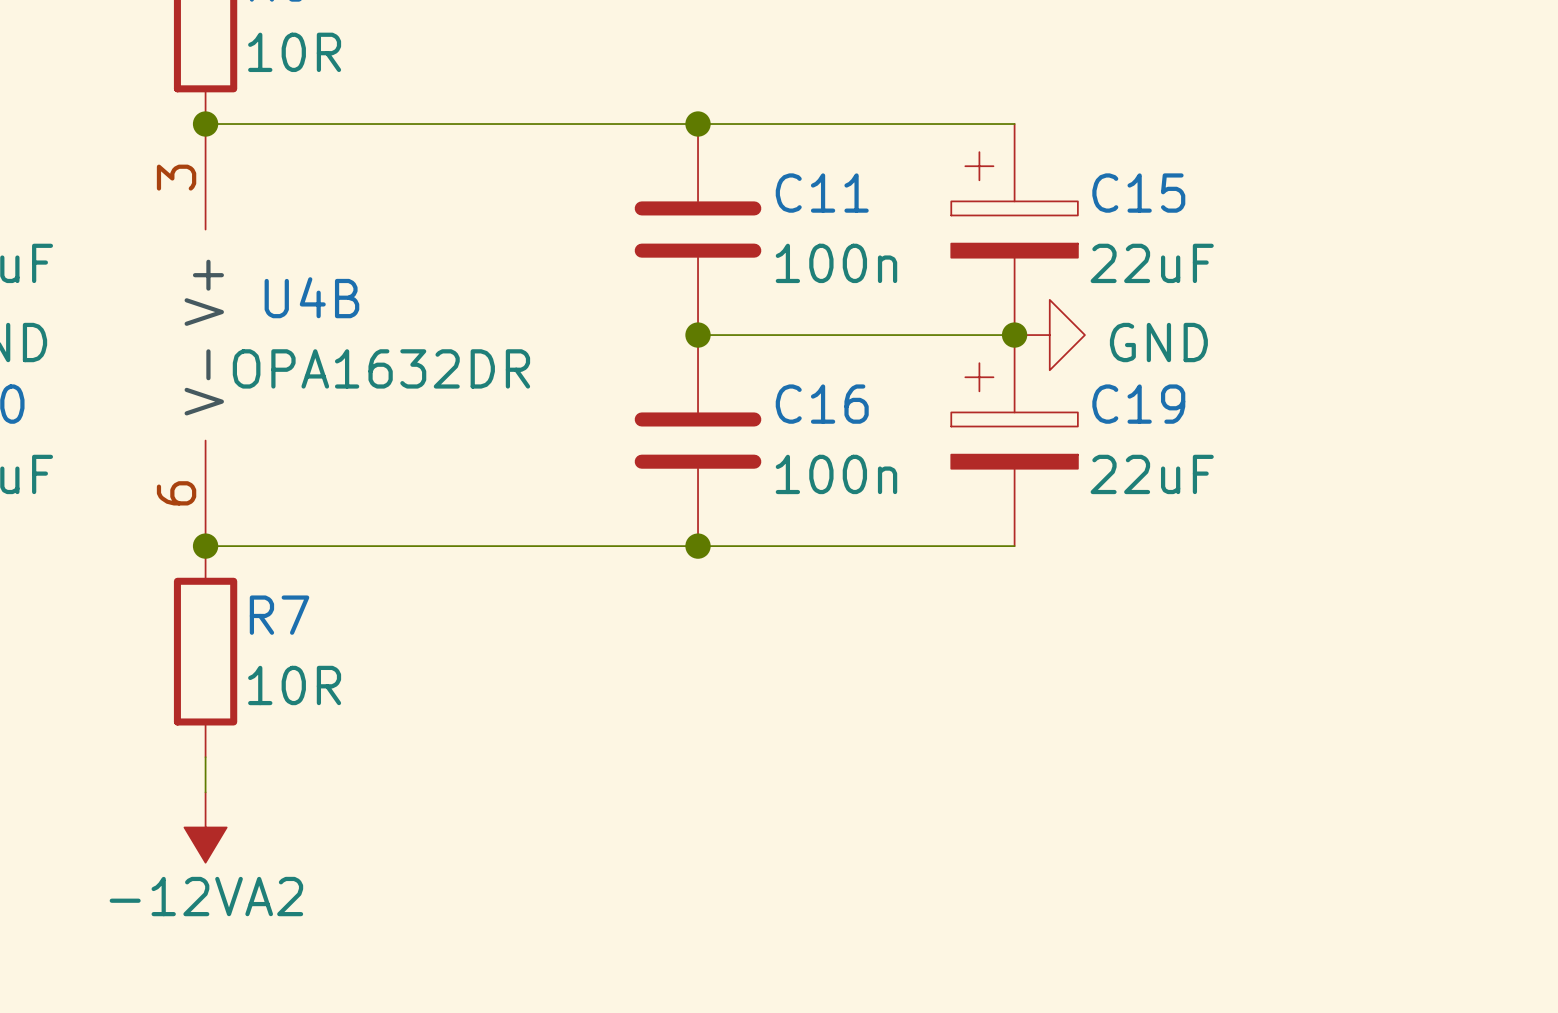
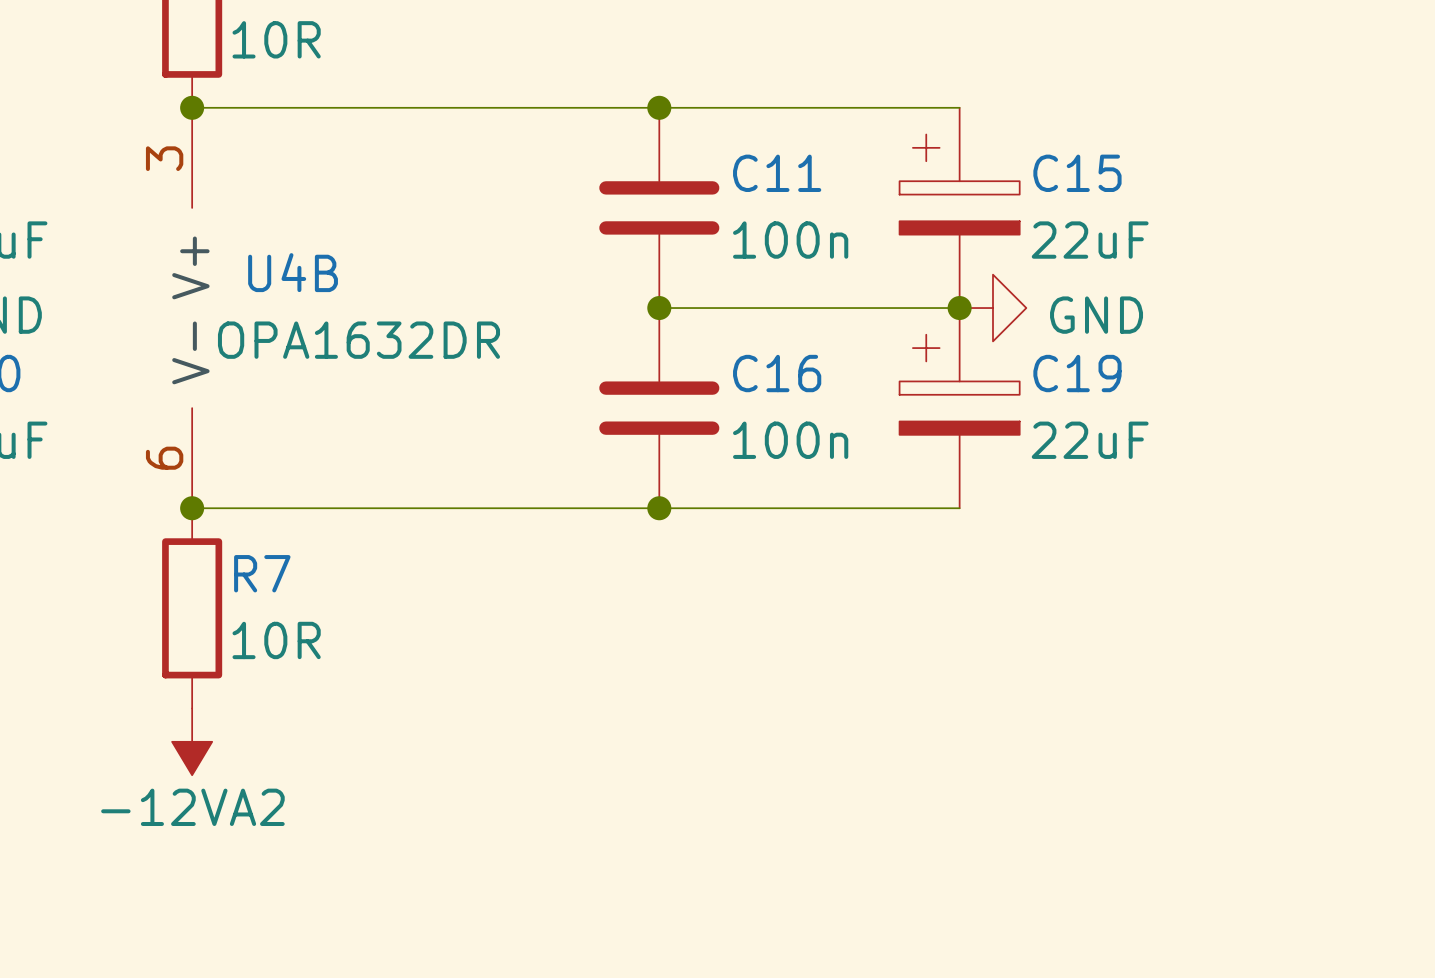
power symbol position: -12VA2 (205, 827) -> -12VA2 (192, 741)

